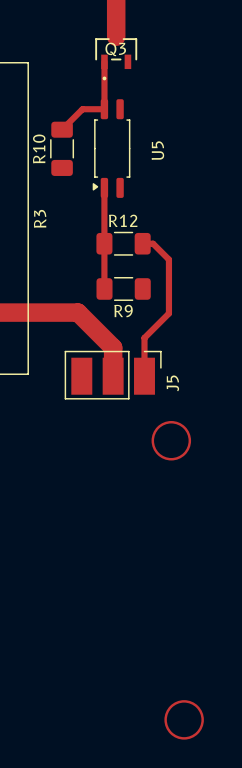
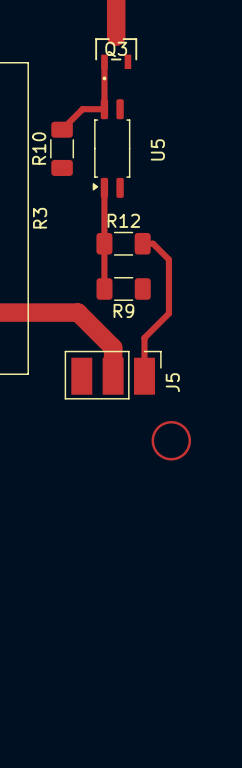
drawing: [164, 700, 204, 740] -> none

